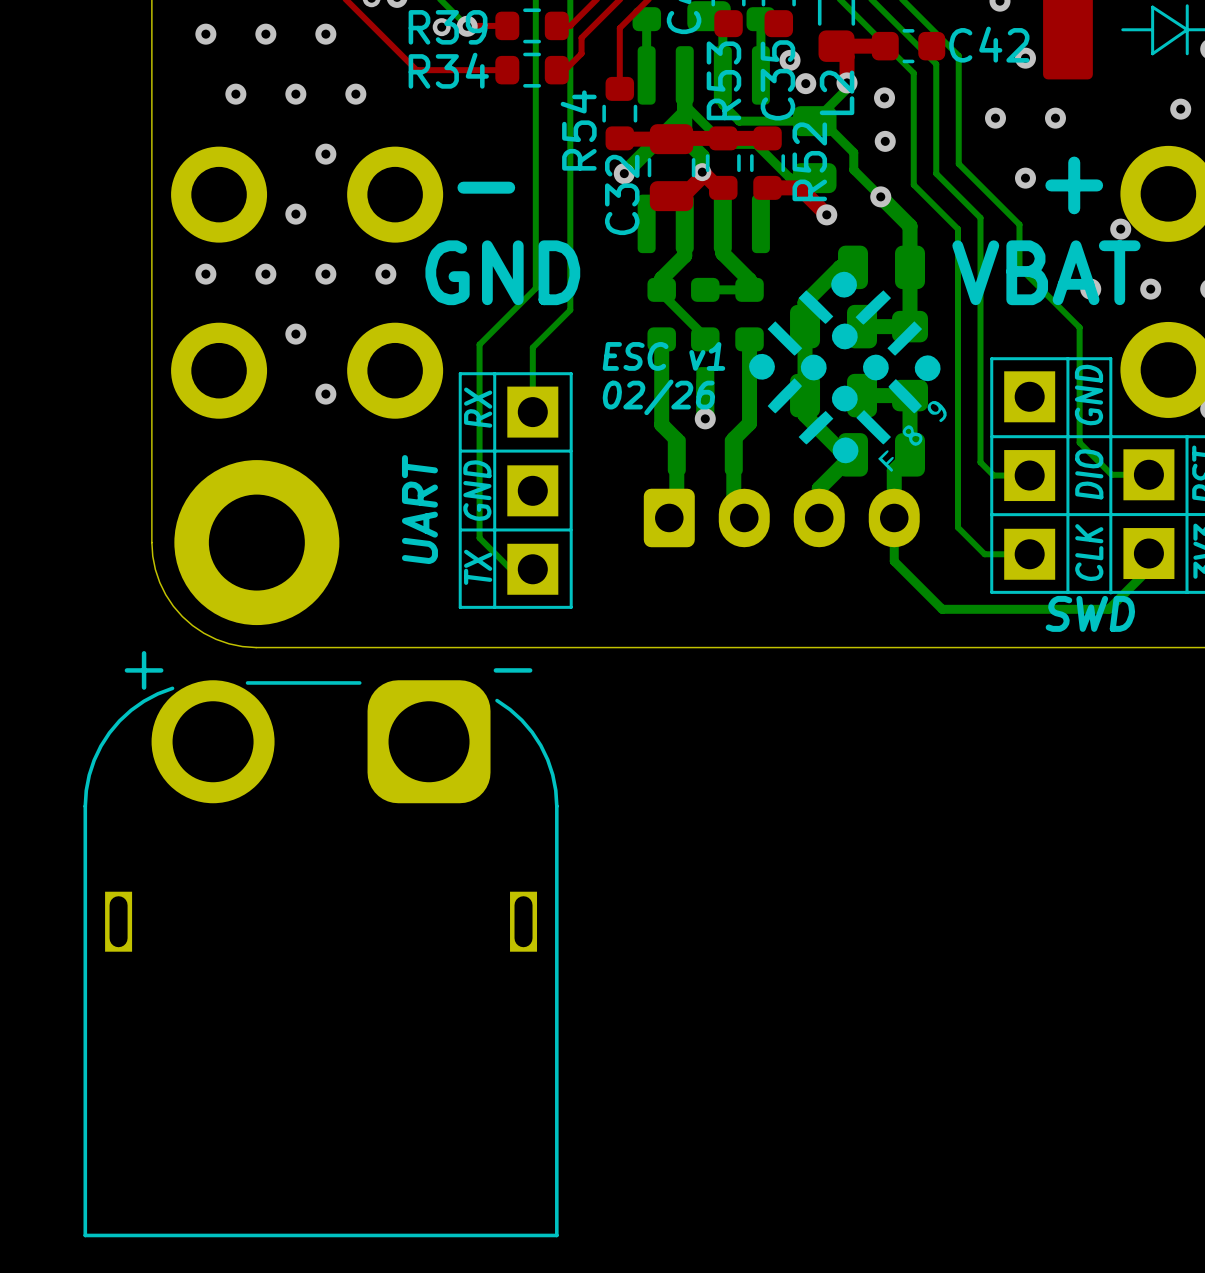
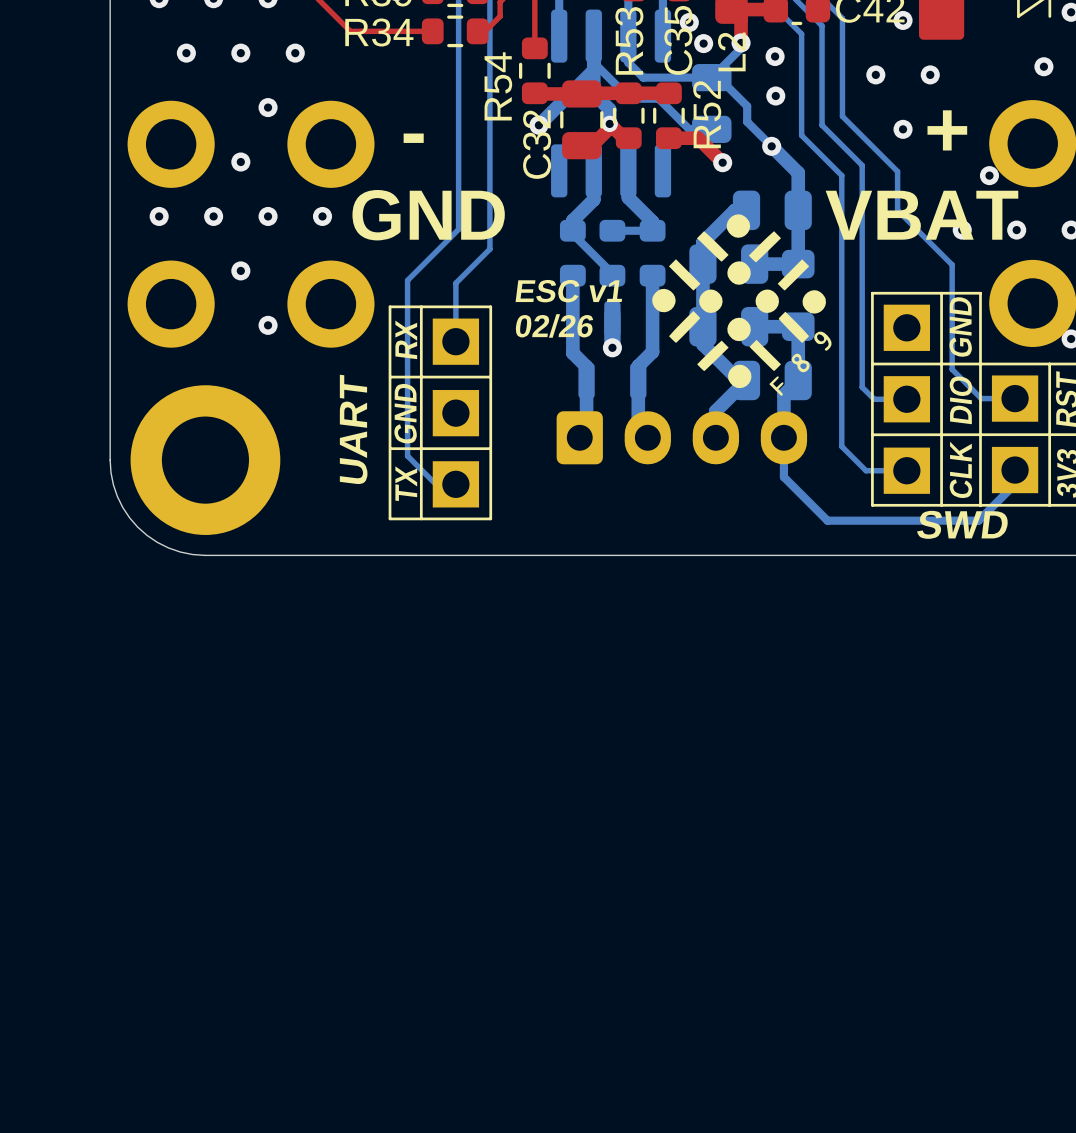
part: (321, 958) -> none

